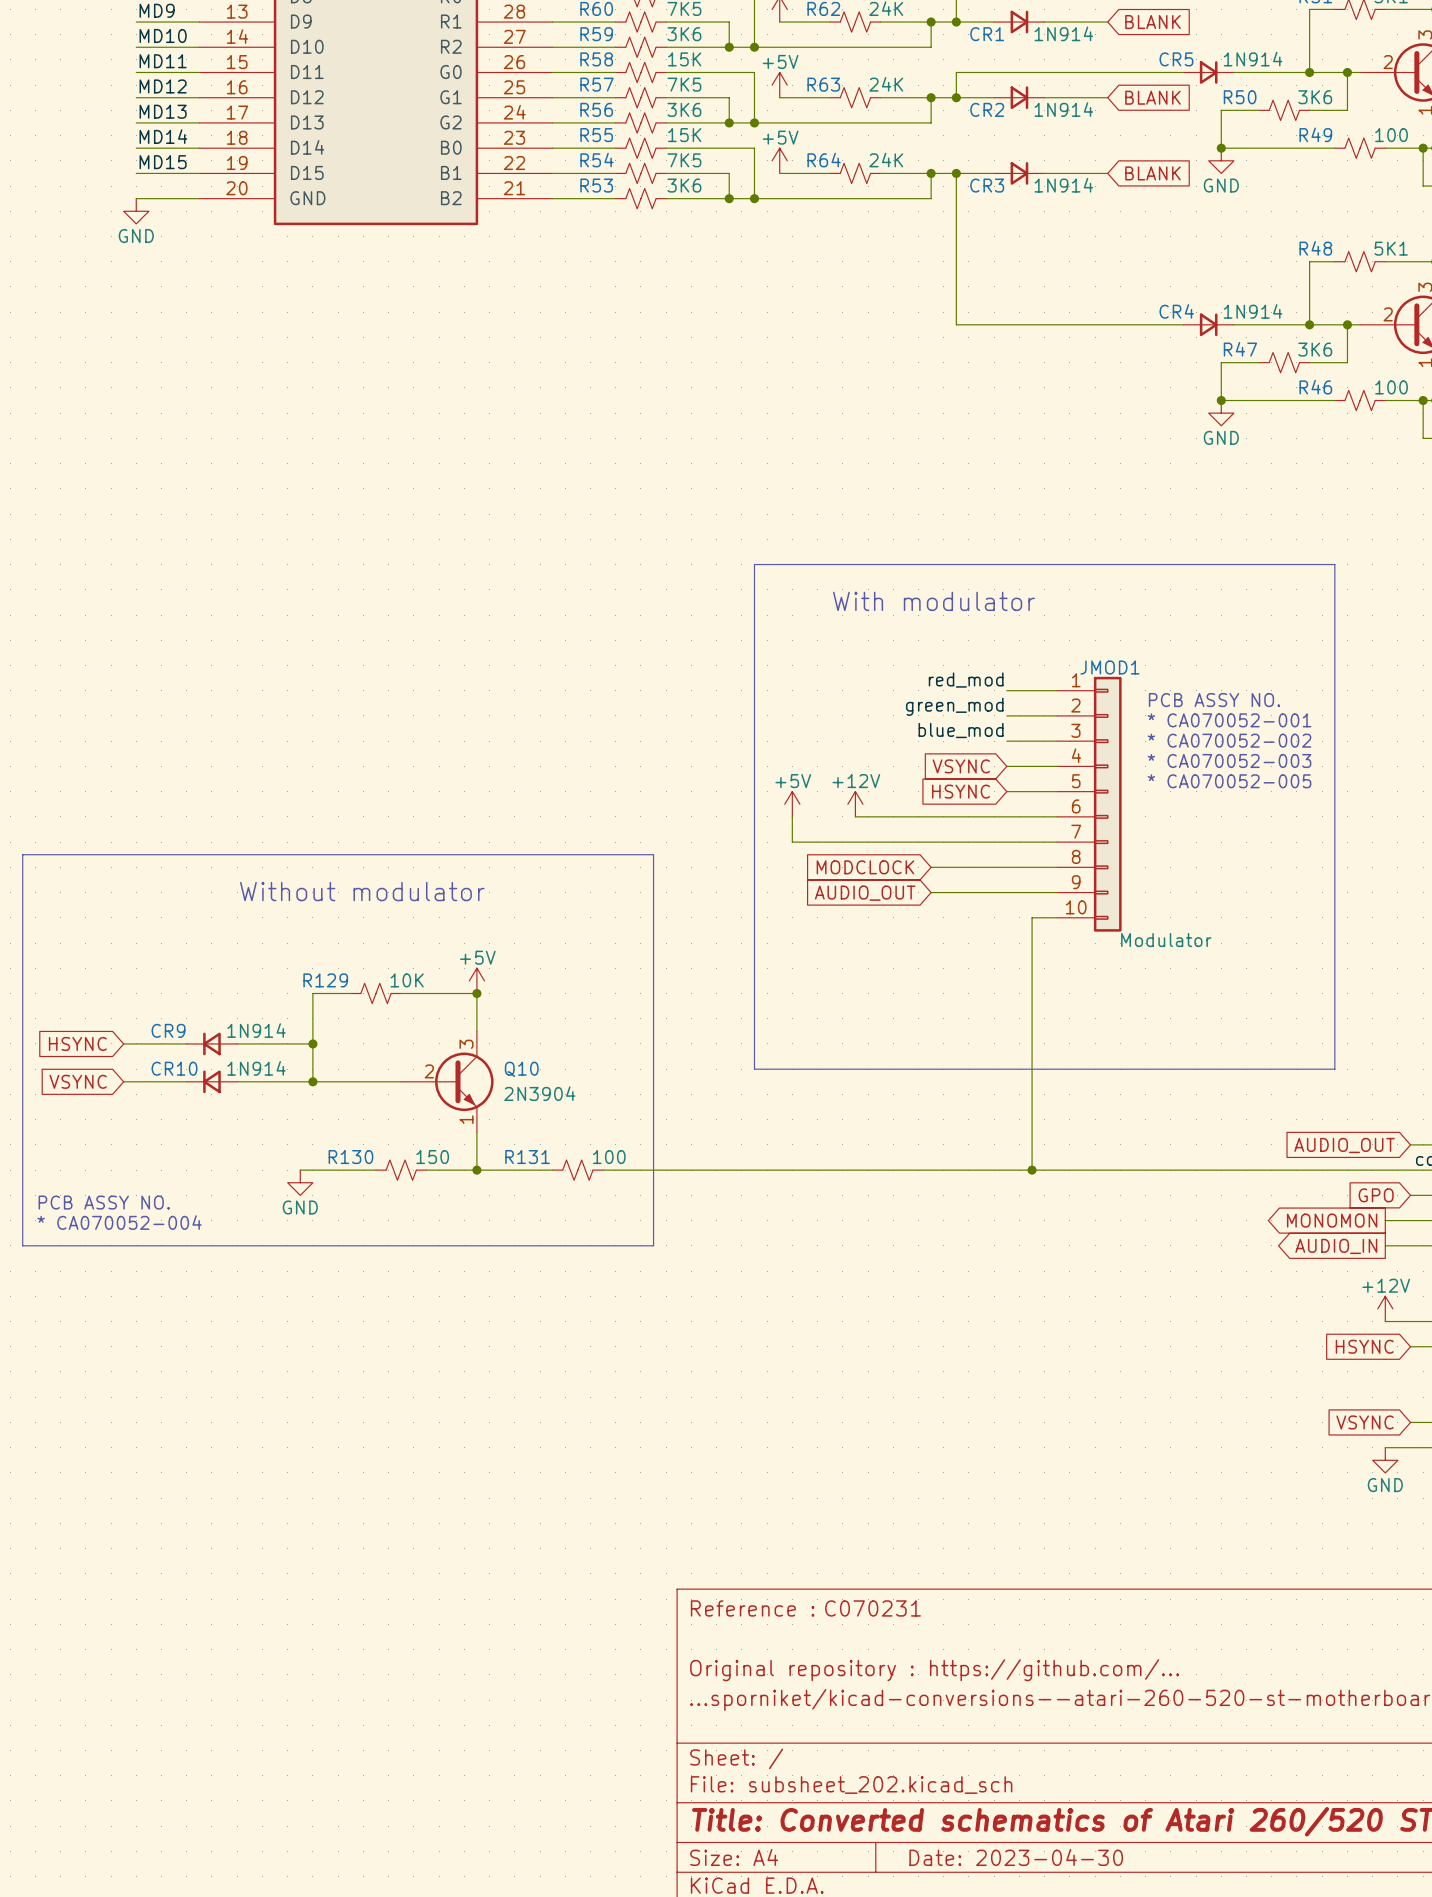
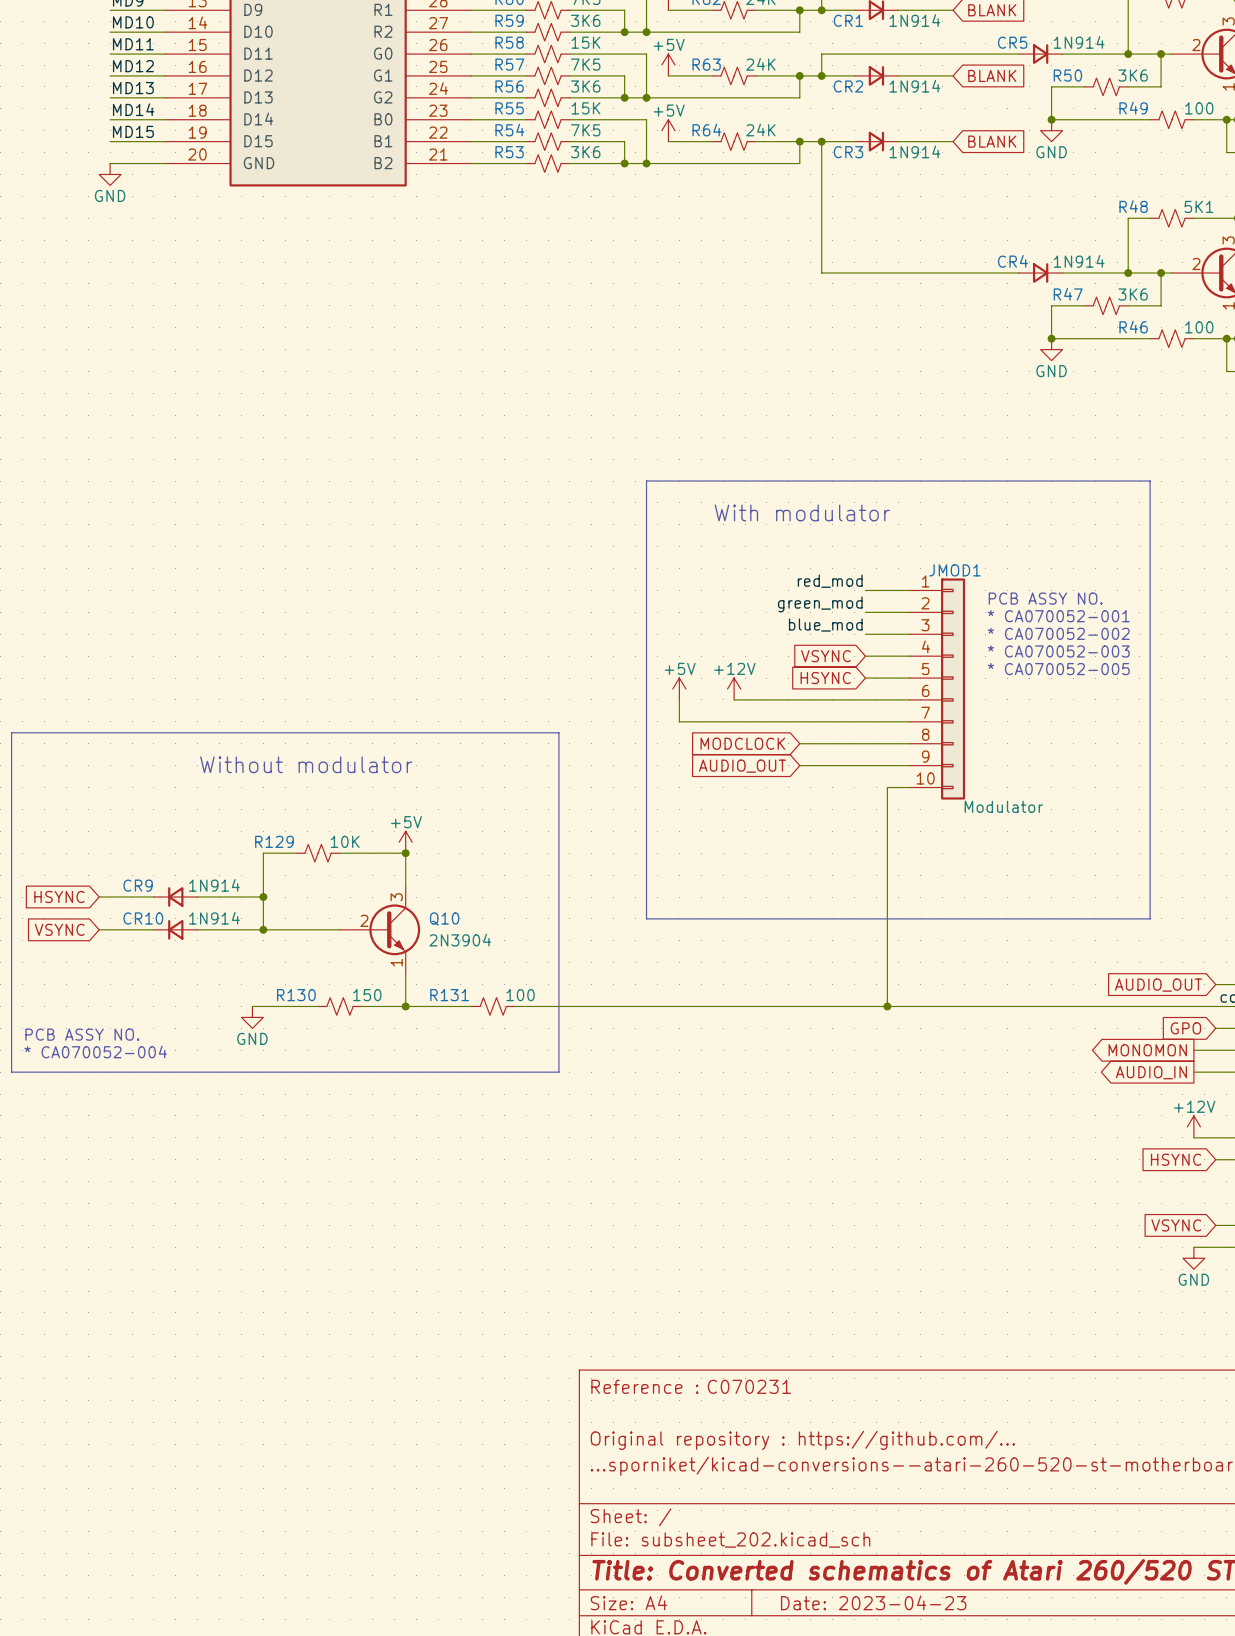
title block: Date: 2023-04-30 (1016, 1857) -> Date: 2023-04-23 (873, 1602)

